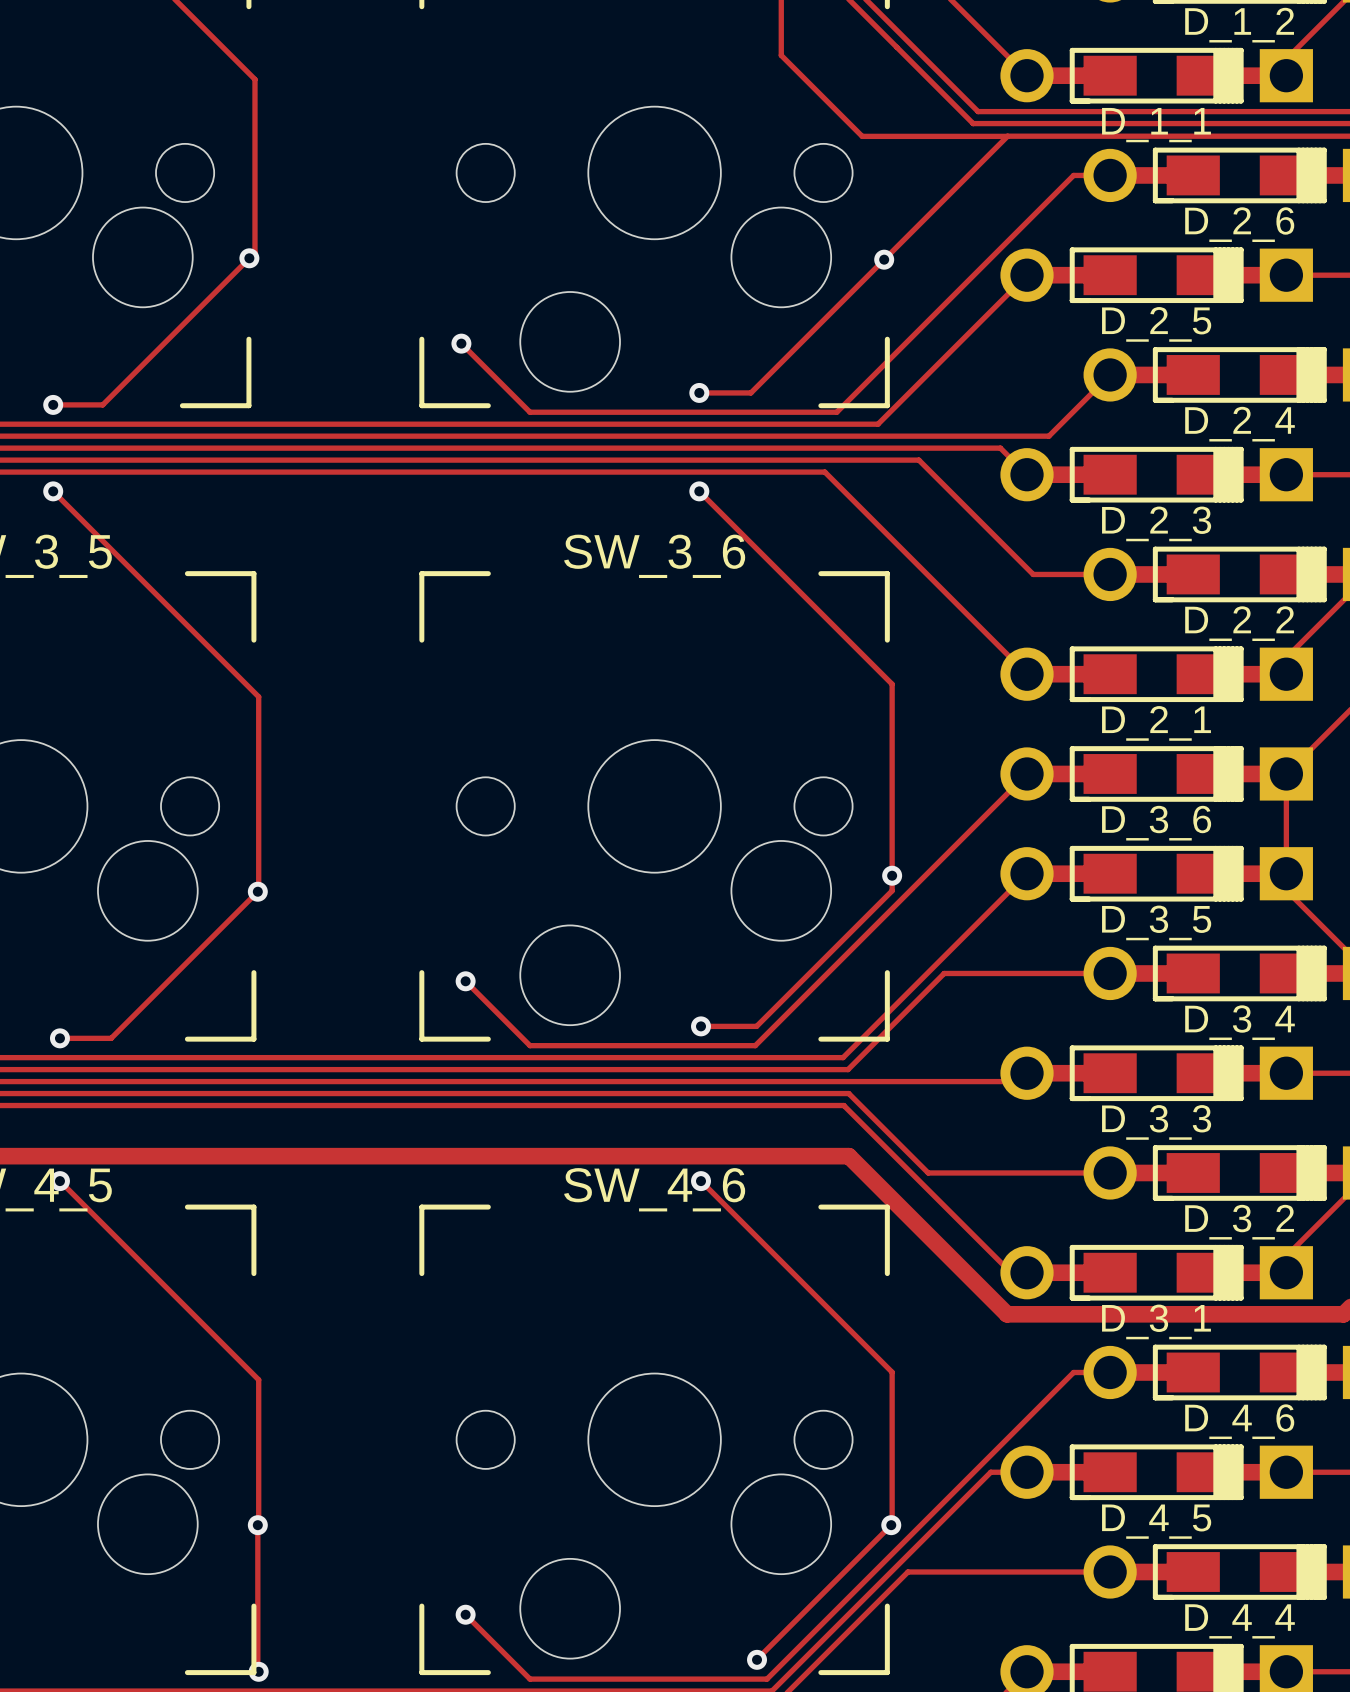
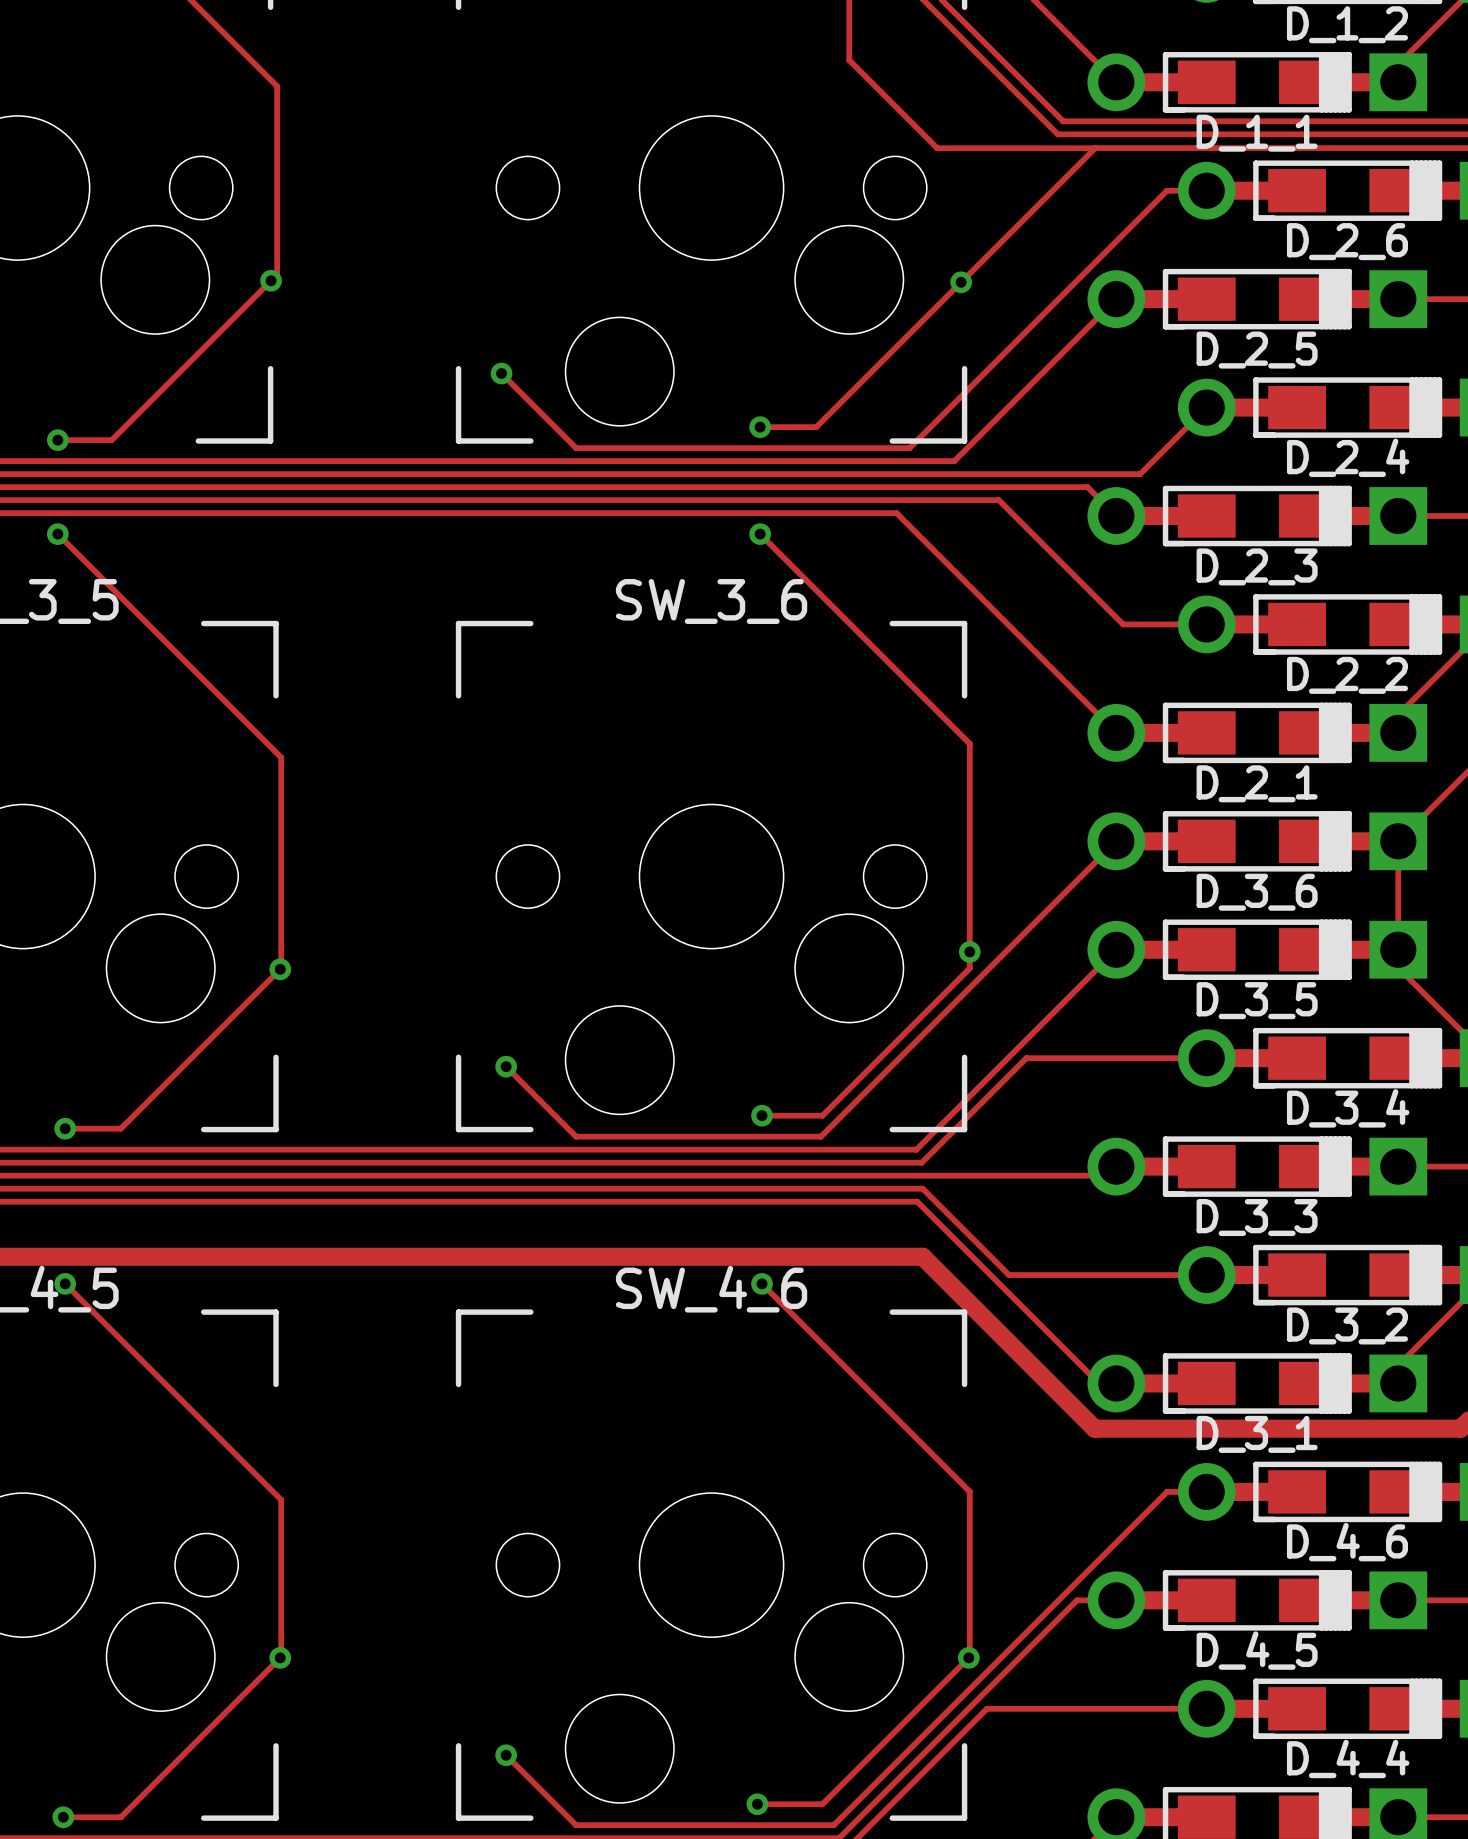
track: (257, 1525) (258, 1671) -> (280, 1657) (120, 1817) (63, 1817)
track: none -> (757, 1804) (822, 1804)
via position: (757, 1659) -> (757, 1804)
via: none -> (63, 1817)
via: (258, 1671) -> none

